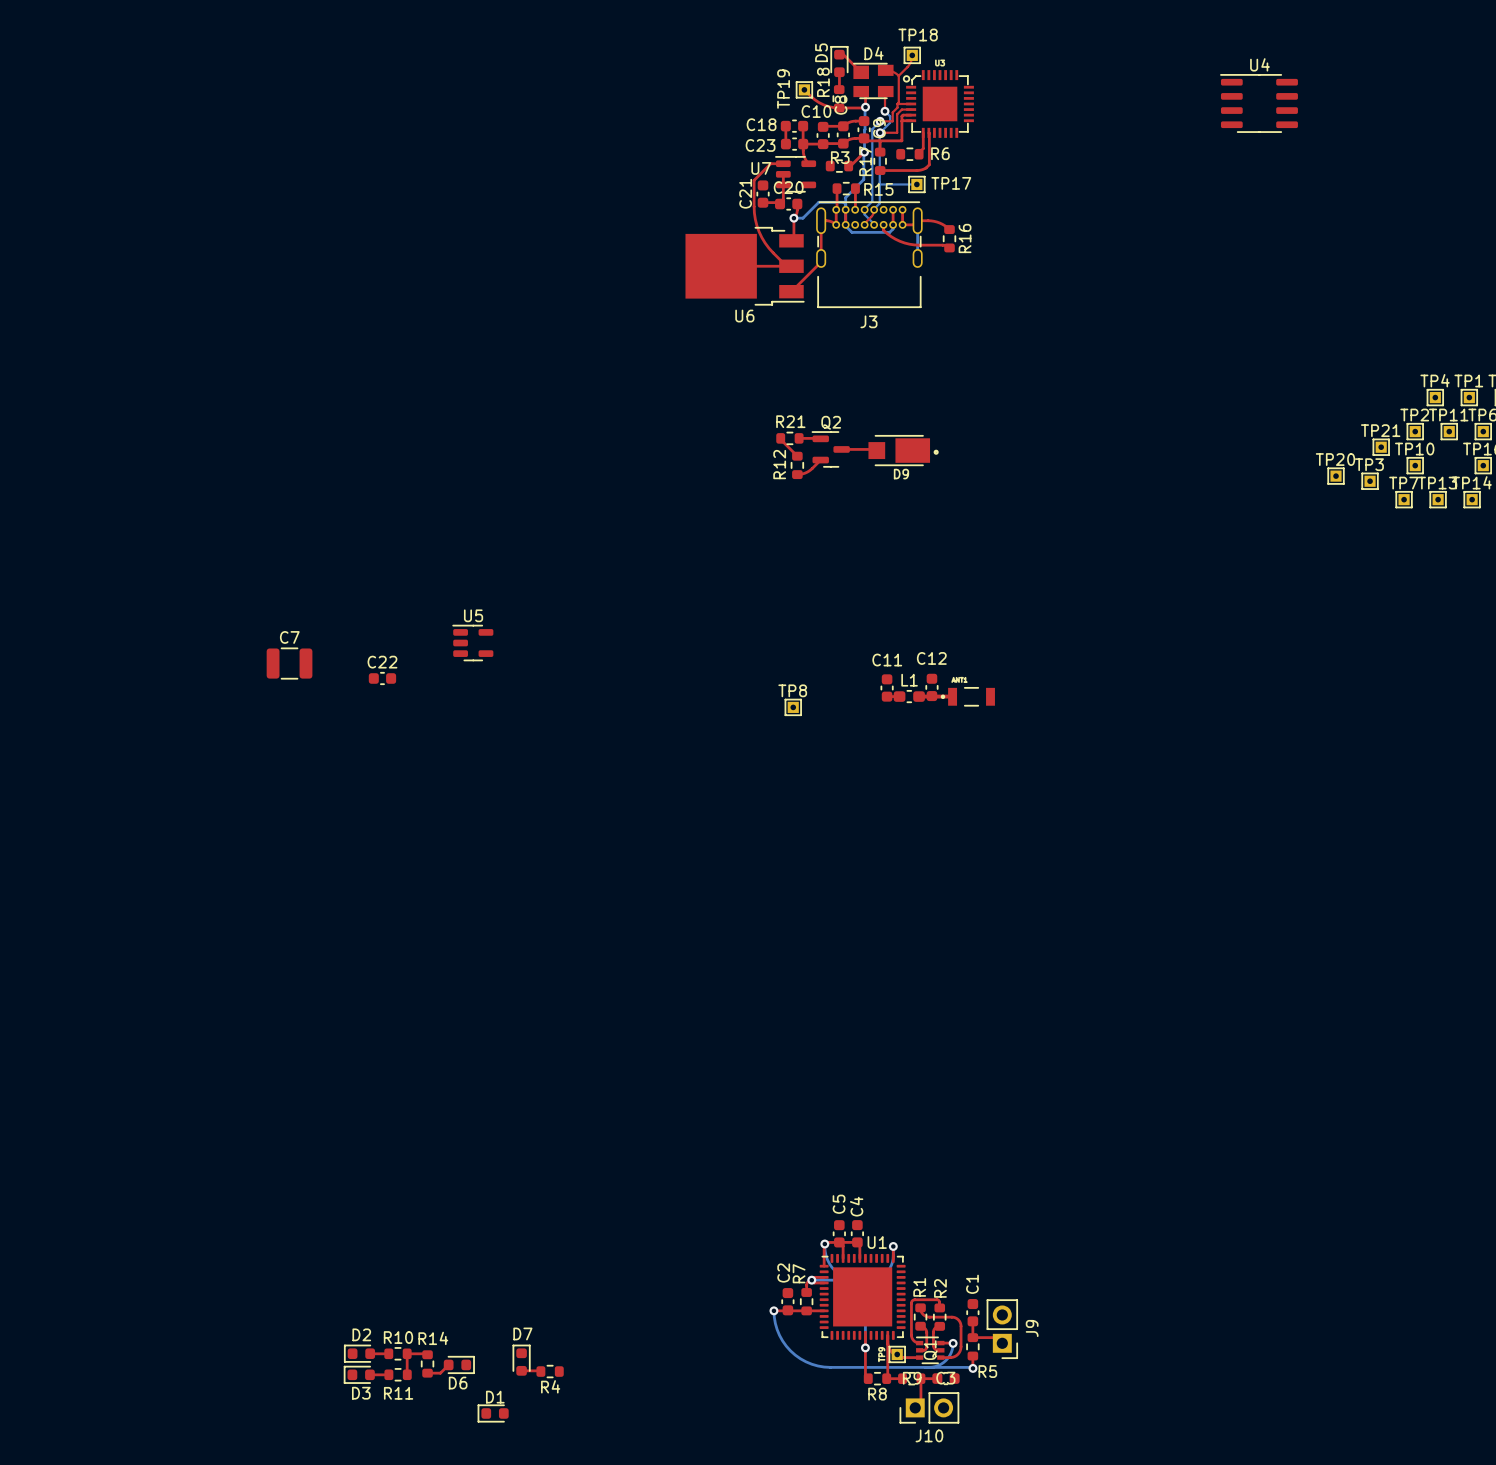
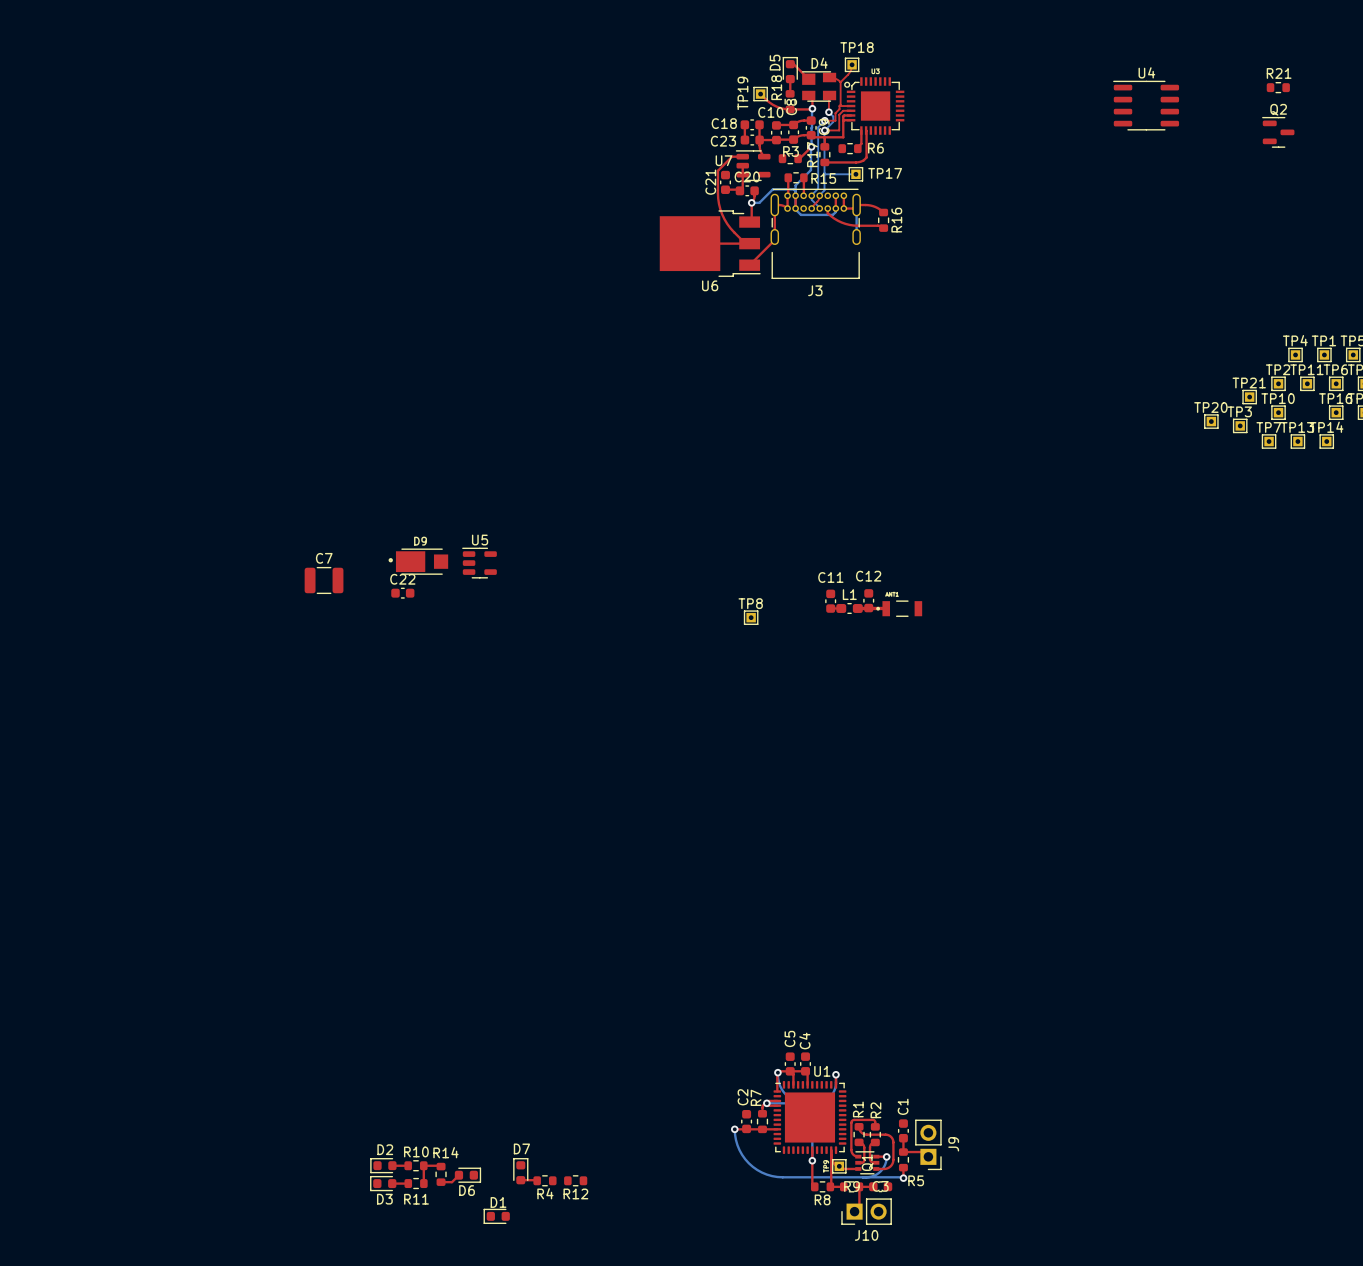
top track: (780, 438) (797, 456) -> none
R21 position: (789, 438) -> (1278, 87)
top track: (799, 438) (820, 438) -> none
Q2 position: (830, 449) -> (1278, 132)
top track: (841, 449) (876, 450) -> none
D9 rotation: 0° (903, 450) -> 180° (418, 561)
D9 position: (903, 450) -> (418, 561)
top track: (820, 460) (809, 471) (797, 474) -> none
R12 name position: R12 (779, 464) -> R12 (575, 1193)
R12 rotation: 0° (797, 465) -> 90° clockwise (575, 1180)
R12 position: (797, 465) -> (575, 1180)

